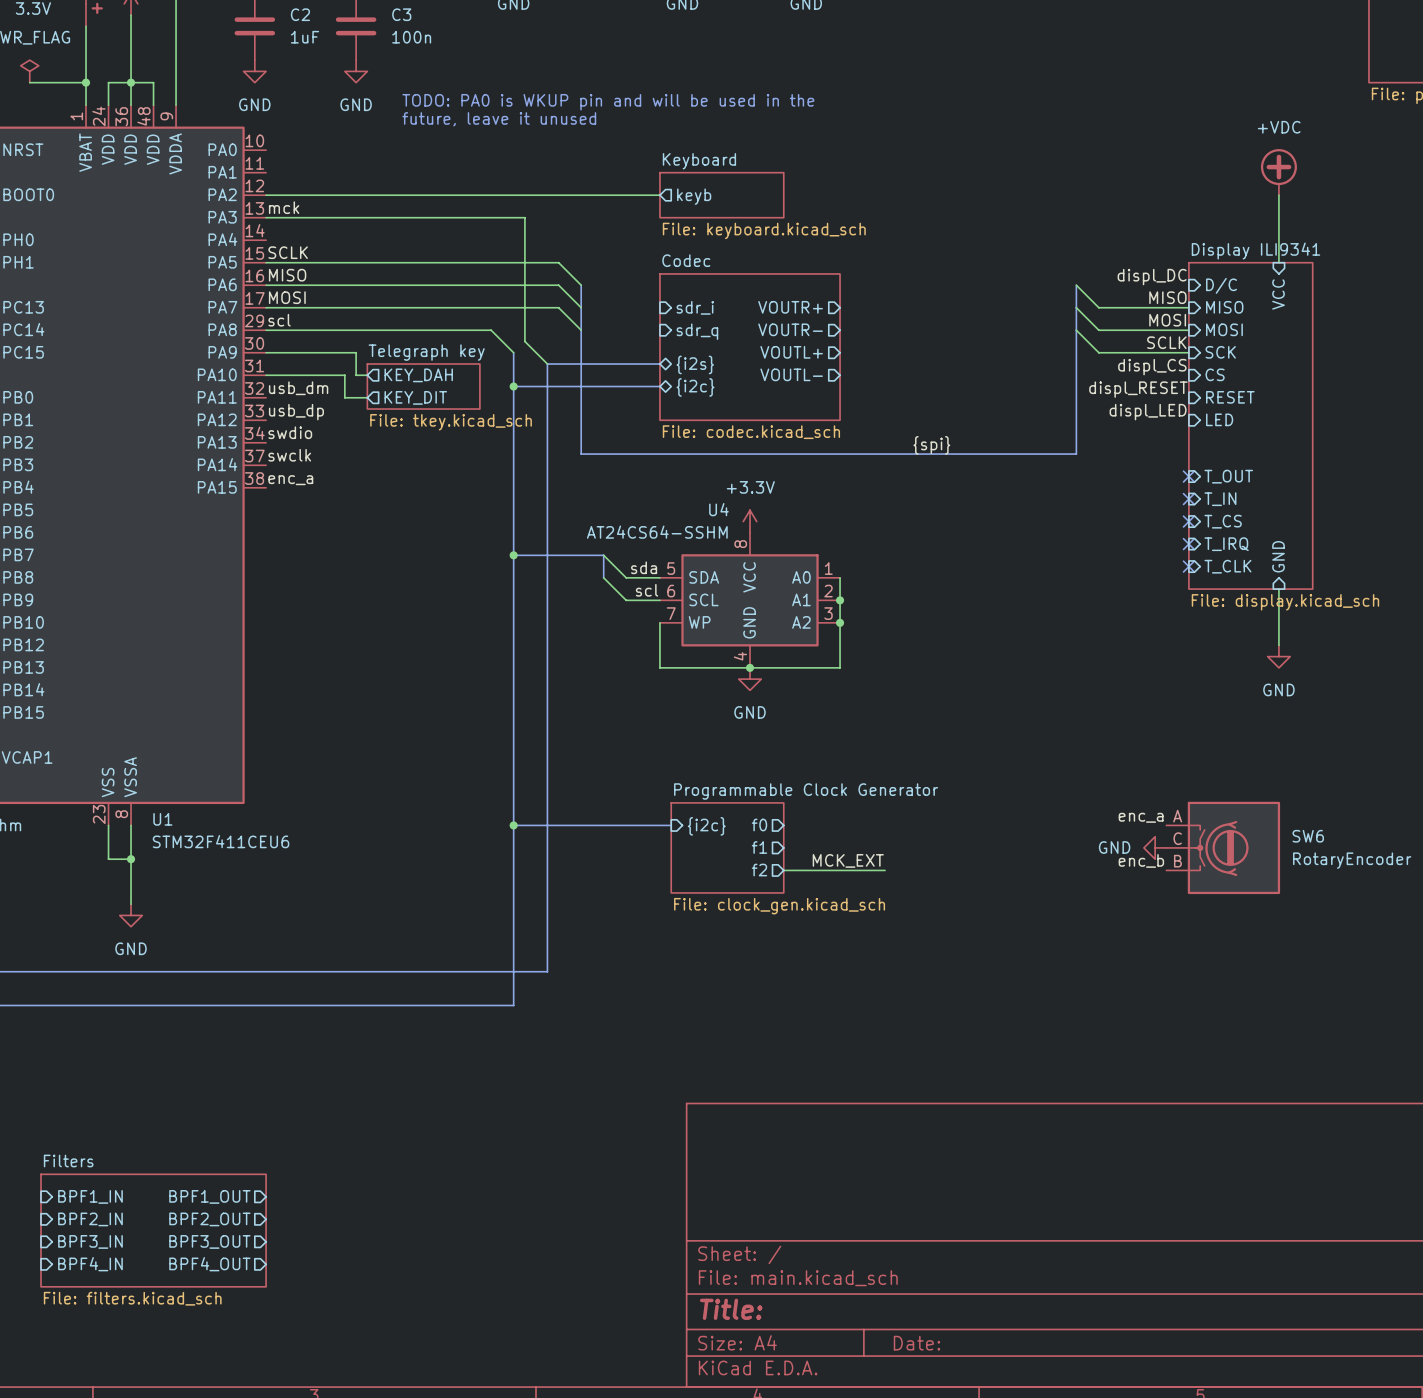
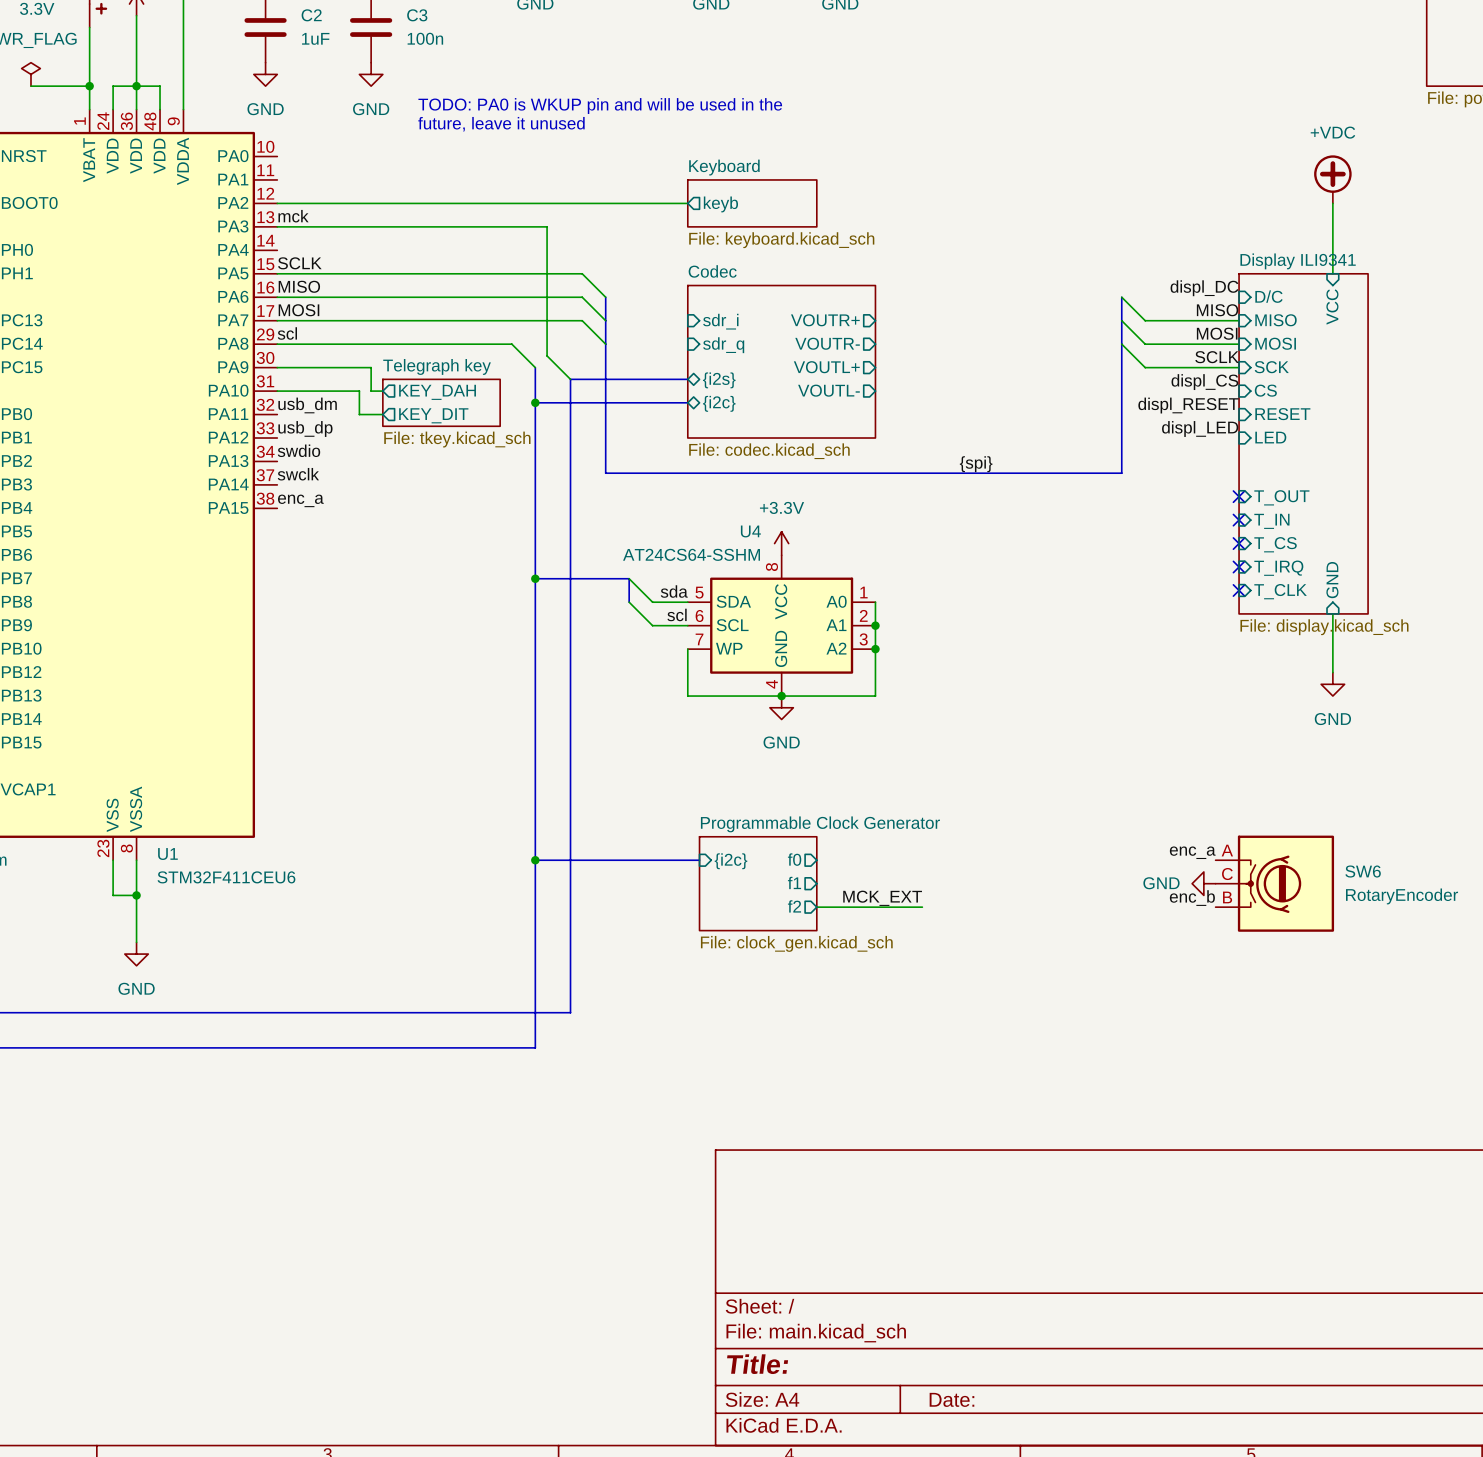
sheet pin: BPF1_IN (90, 1196) -> none
sheet pin: BPF1_OUT (209, 1196) -> none
sheet pin: BPF2_IN (90, 1219) -> none
sheet pin: BPF2_OUT (209, 1219) -> none
sheet Filters: File: filters.kicad_sch (153, 1230) -> none
sheet pin: BPF3_IN (90, 1241) -> none
sheet pin: BPF3_OUT (209, 1241) -> none
sheet pin: BPF4_IN (90, 1264) -> none
sheet pin: BPF4_OUT (209, 1264) -> none

